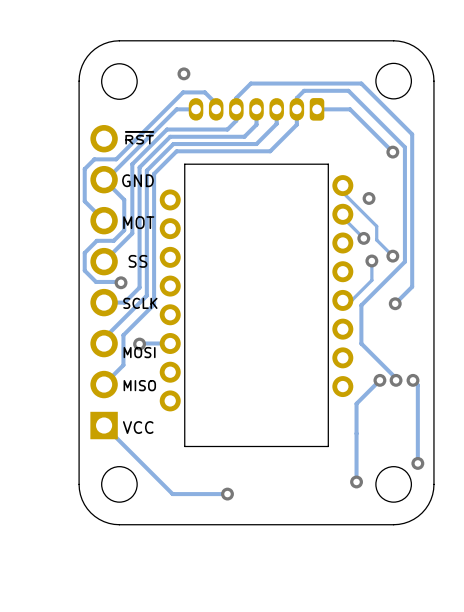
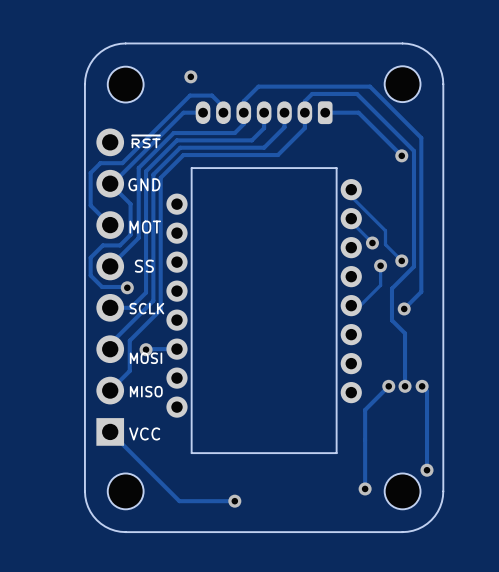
via: (369, 198) -> none
track: (383, 283) (361, 305) (361, 343) (396, 378) -> (392, 288) (392, 320) (405, 333) (405, 384)

